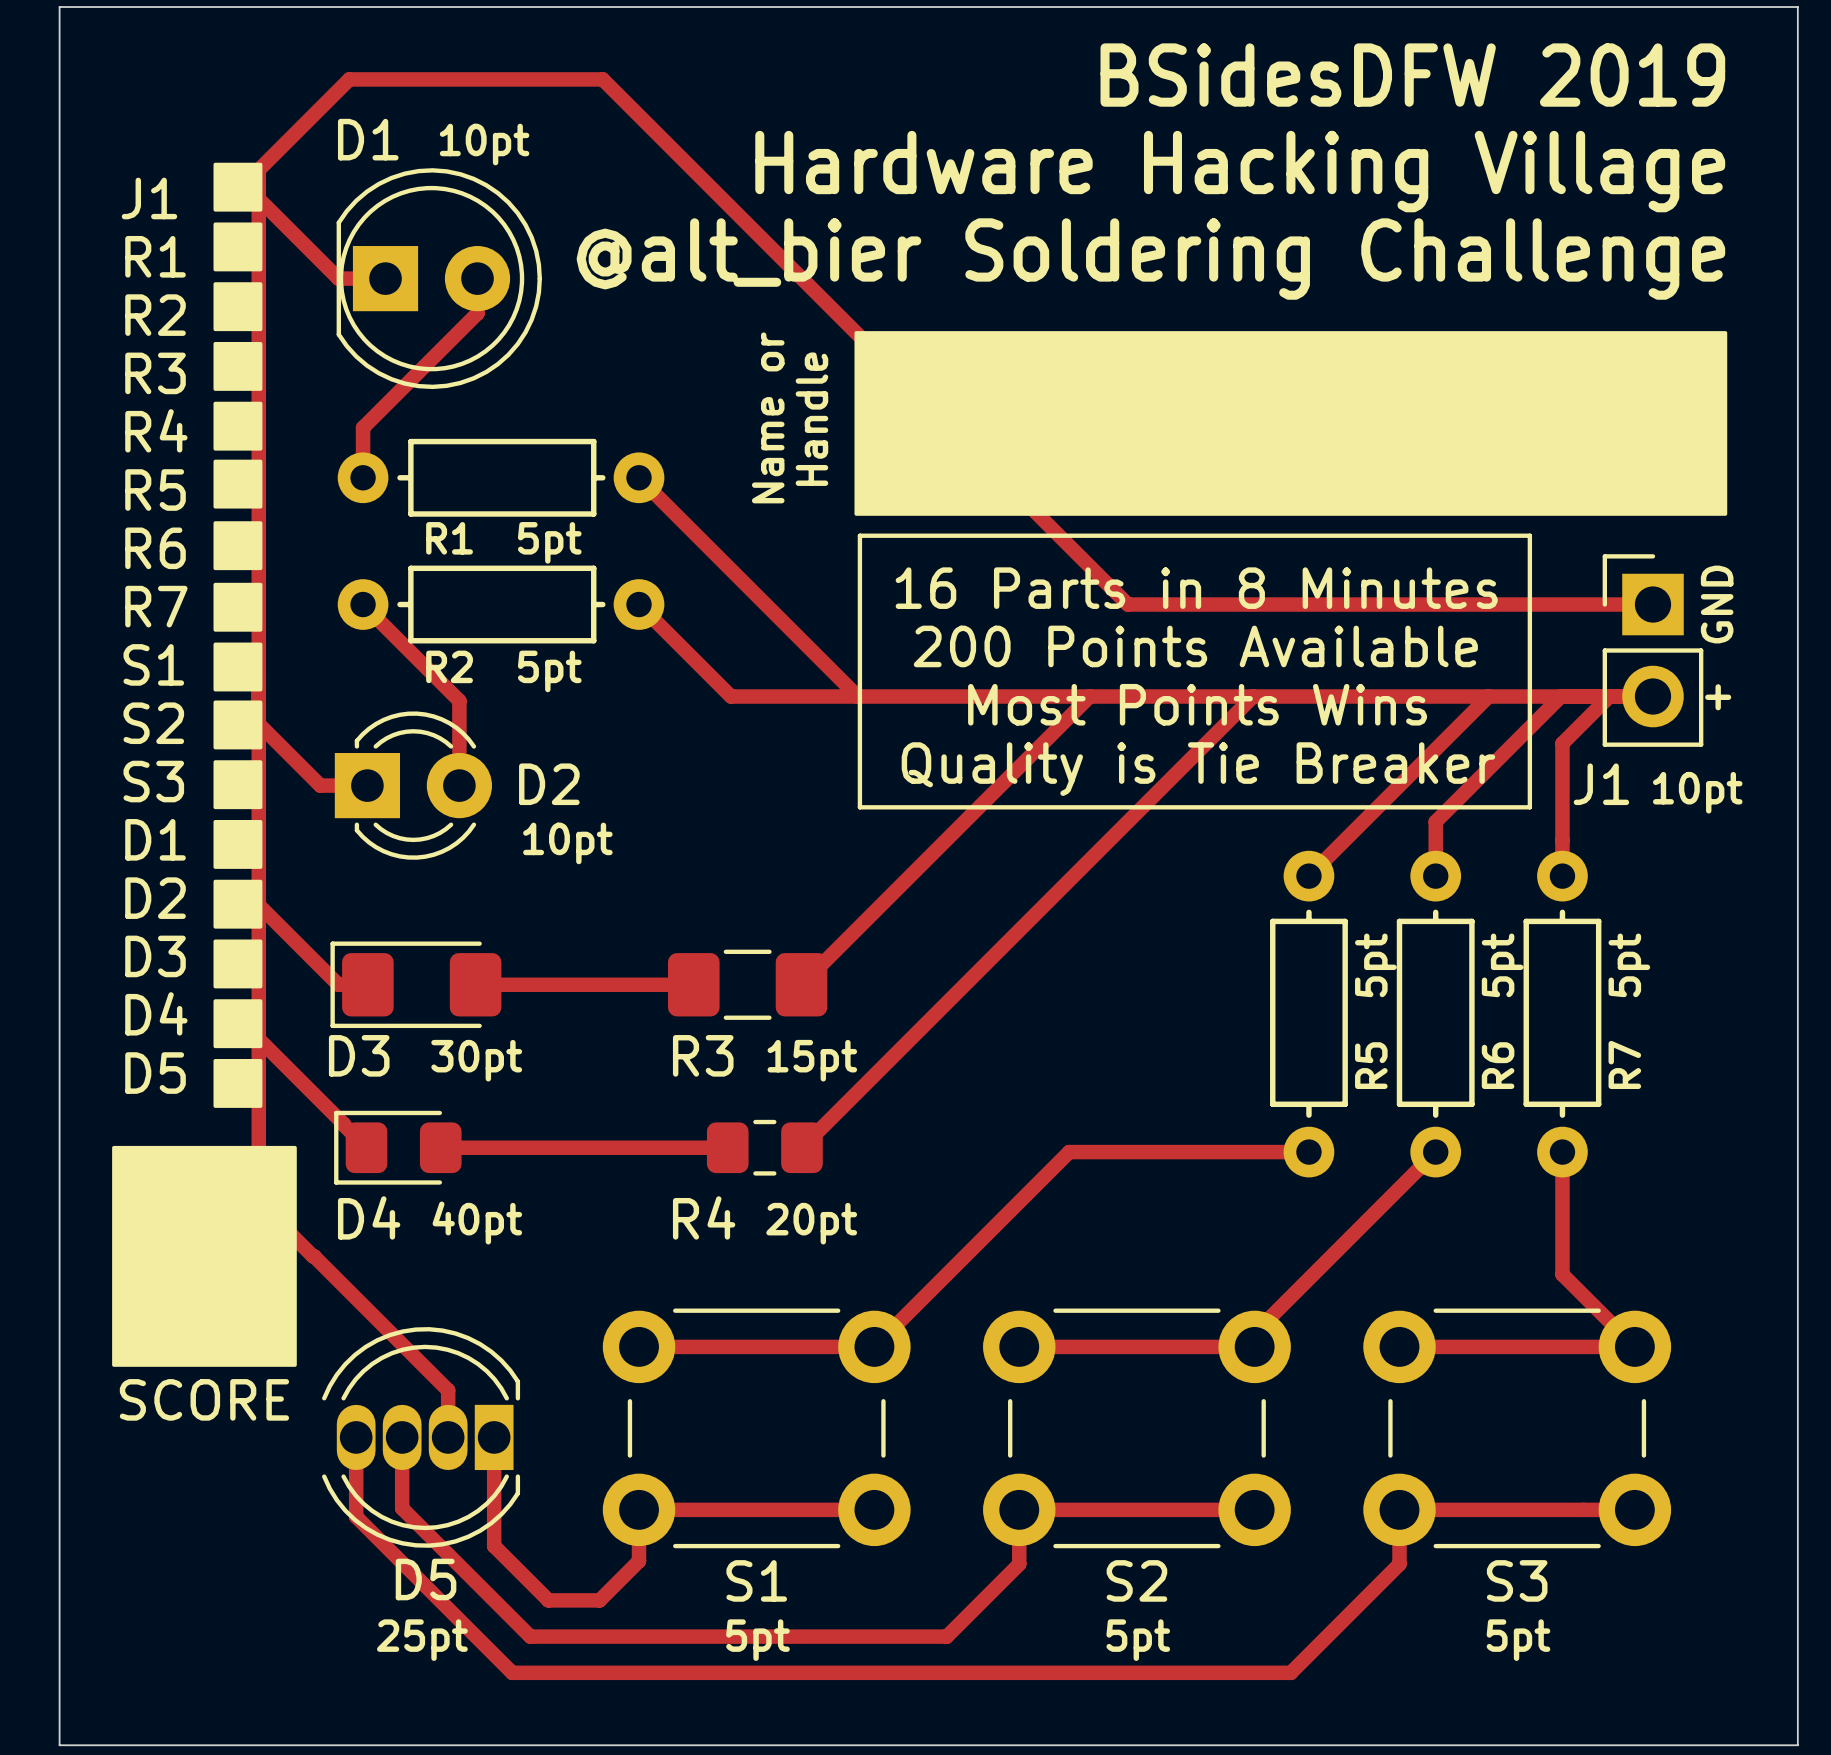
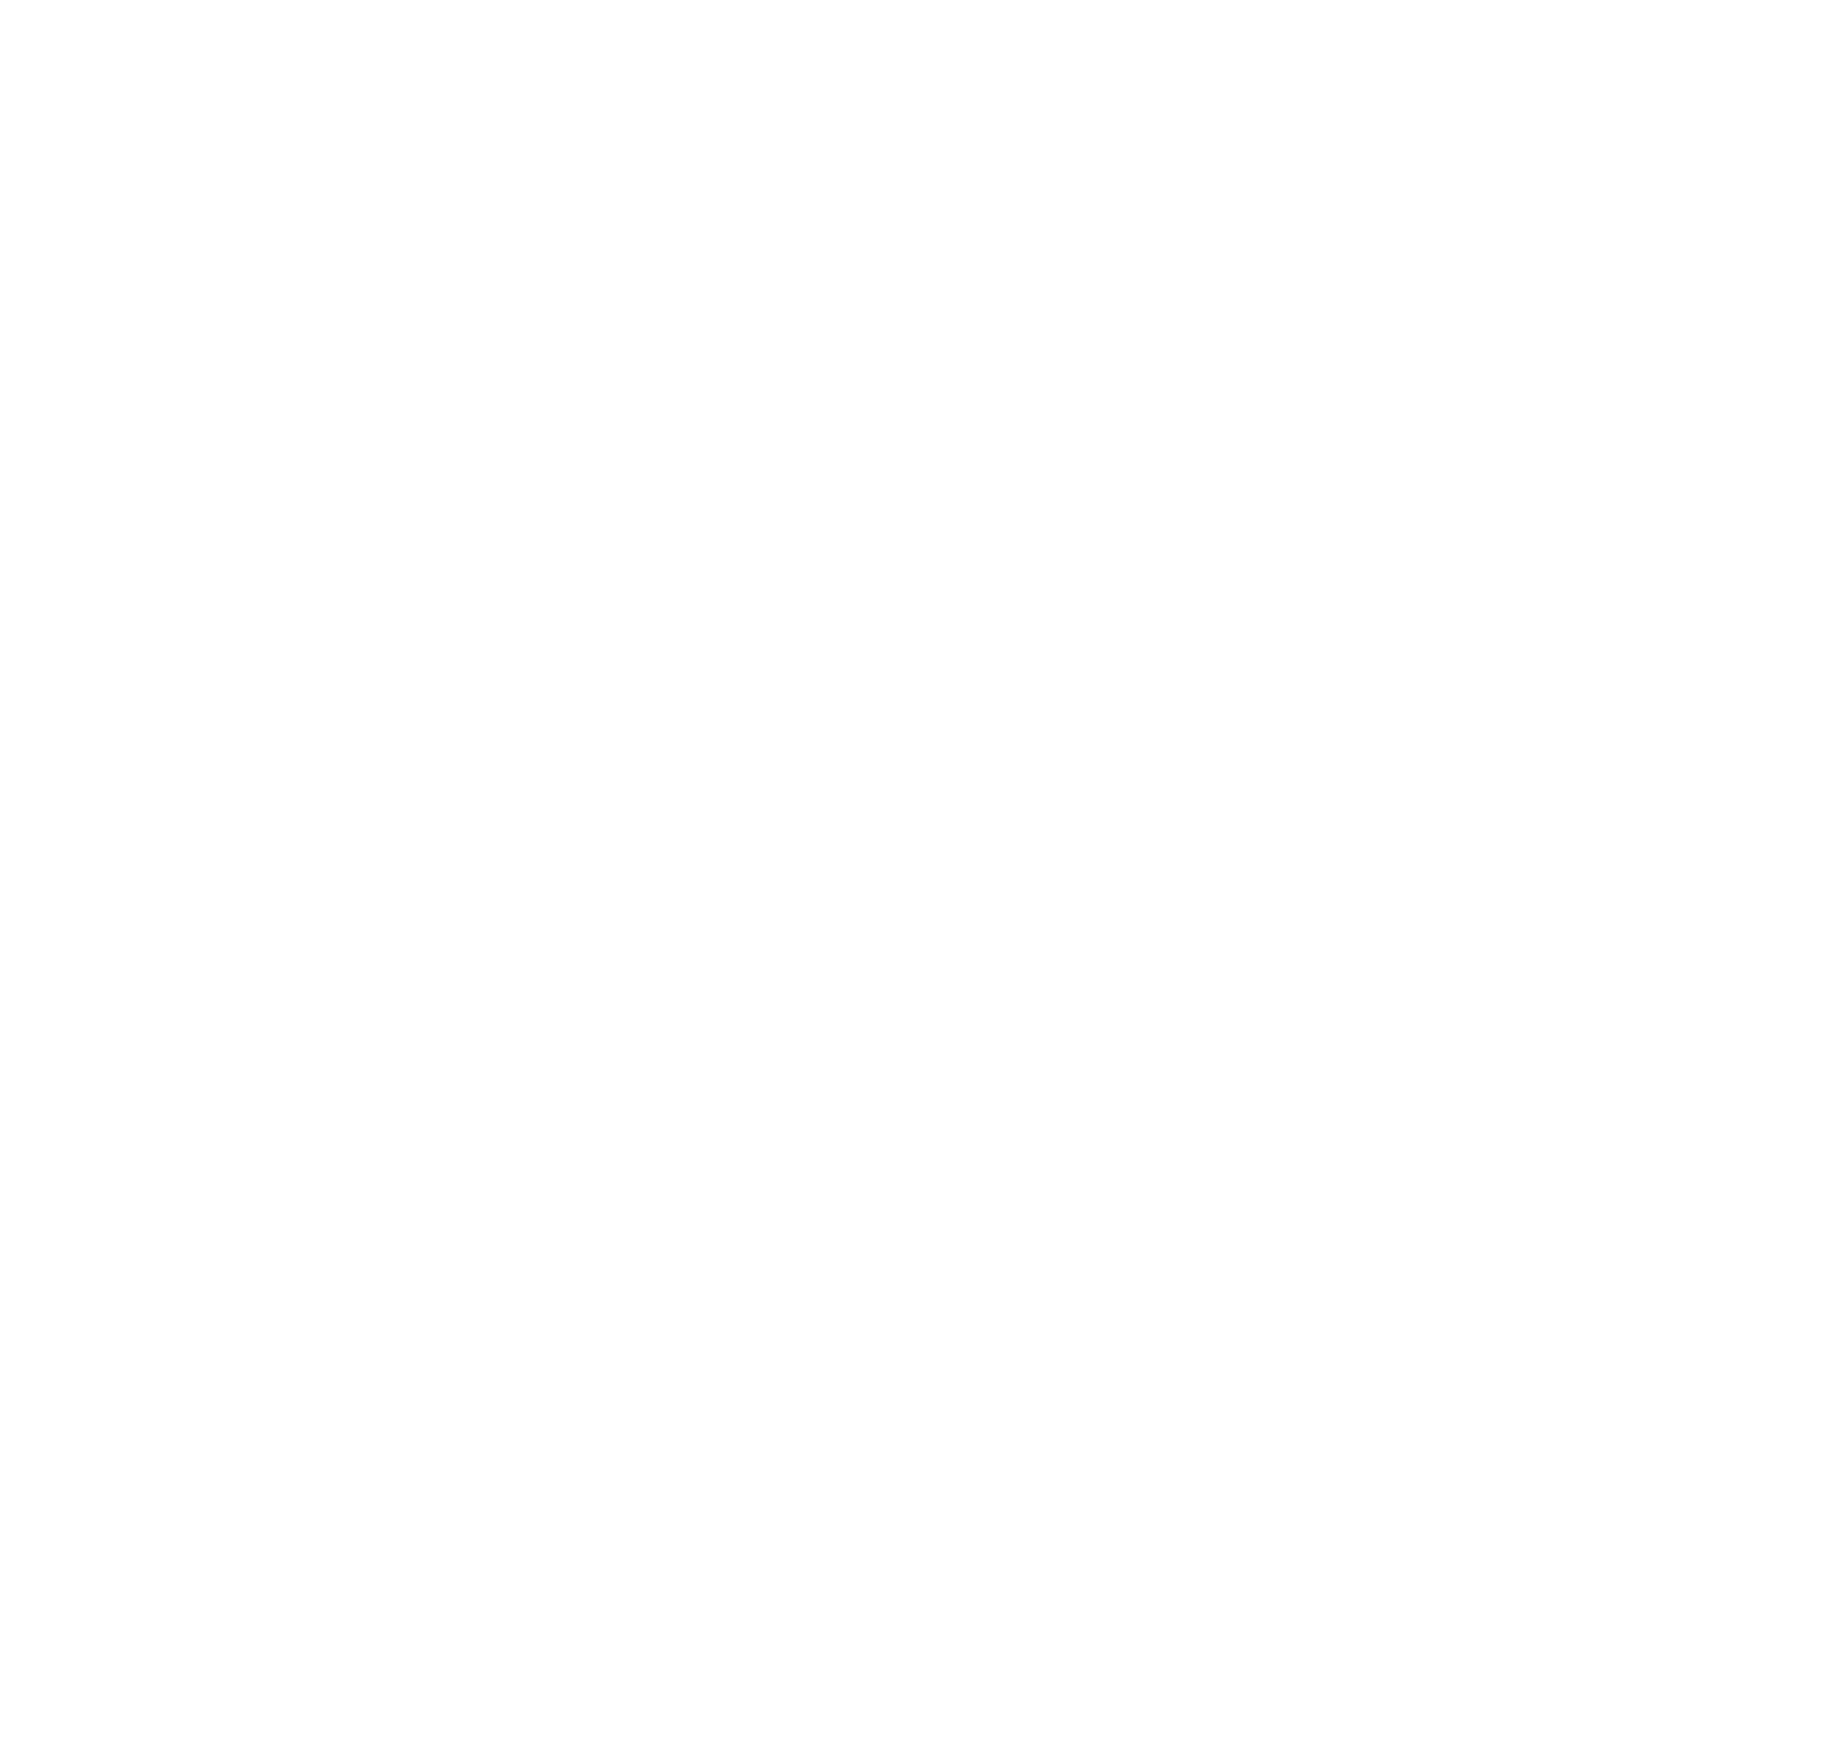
board edge: (59, 7) (59, 1745) (1797, 1745) (1797, 7) (59, 7) -> none
text: BSidesDFW 2019 (1412, 75) -> none
drawing: [112, 162, 297, 1367] -> none
text: Hardware Hacking Village (1240, 171) -> none
text: J1 (149, 198) -> none
top track: (258, 198) (338, 278) (385, 278) -> none
text: R1 (155, 256) -> none
text: @alt_bier Soldering Challenge (1150, 259) -> none
D1: (439, 278) -> none
top track: (477, 278) (477, 313) (363, 427) (363, 477) -> none
text: R2 (155, 315) -> none
drawing: [854, 331, 1728, 516] -> none
text: R3 (155, 373) -> none
text: Name or (768, 417) -> none
text: Handle (811, 419) -> none
text: R4 (156, 430) -> none
R1: (501, 477) -> none
top track: (639, 477) (857, 696) -> none
text: R5 (155, 490) -> none
line: (859, 535) (1529, 535) (1529, 807) (859, 807) (859, 535) -> none
text: R6 (155, 548) -> none
text: 16 Parts in 8 Minutes (1196, 588) -> none
top track: (363, 604) (459, 700) (459, 785) -> none
R2: (501, 604) -> none
top track: (639, 604) (730, 696) (1652, 696) -> none
top track: (1652, 604) (1127, 604) (602, 79) (349, 79) (258, 169) (258, 1202) (448, 1390) (448, 1437) -> none
text: R7 (156, 606) -> none
text: 200 Points Available (1195, 646) -> none
J1: (1652, 650) -> none
text: S1 (153, 664) -> none
top track: (1089, 696) (801, 984) -> none
top track: (1253, 696) (801, 1147) -> none
top track: (1488, 696) (1308, 876) -> none
top track: (1561, 696) (1435, 821) (1435, 876) -> none
top track: (1609, 696) (1562, 743) (1562, 876) -> none
text: Most Points Wins (1197, 704) -> none
text: S2 (153, 723) -> none
top track: (258, 724) (320, 785) (367, 785) -> none
text: Quality is Tie Breaker (1198, 769) -> none
text: S3 (153, 781) -> none
D2: (413, 785) -> none
text: D1 (155, 839) -> none
text: D2 (155, 898) -> none
top track: (258, 905) (338, 984) (367, 984) -> none
text: D3 (155, 956) -> none
D3: (415, 984) -> none
top track: (475, 984) (693, 984) -> none
R3: (747, 984) -> none
text: D4 (156, 1013) -> none
R5: (1308, 1014) -> none
R6: (1435, 1014) -> none
R7: (1562, 1014) -> none
top track: (258, 1039) (366, 1147) -> none
text: D5 (155, 1073) -> none
D4: (397, 1147) -> none
top track: (440, 1147) (727, 1147) -> none
R4: (764, 1147) -> none
top track: (1308, 1152) (1069, 1152) (874, 1346) (639, 1346) -> none
top track: (1435, 1152) (1254, 1333) (1254, 1346) (1019, 1346) -> none
top track: (1562, 1152) (1562, 1274) (1634, 1346) (1399, 1346) -> none
text: SCORE (204, 1399) -> none
S1: (756, 1428) -> none
S2: (1136, 1428) -> none
S3: (1517, 1428) -> none
top track: (356, 1437) (356, 1516) (512, 1672) (1290, 1672) (1399, 1564) (1399, 1509) (1634, 1509) -> none
top track: (402, 1437) (402, 1508) (530, 1636) (946, 1636) (1019, 1564) (1019, 1509) (1254, 1509) -> none
D5: (421, 1437) -> none
top track: (494, 1437) (494, 1546) (548, 1600) (599, 1600) (639, 1561) (639, 1509) (874, 1509) -> none

